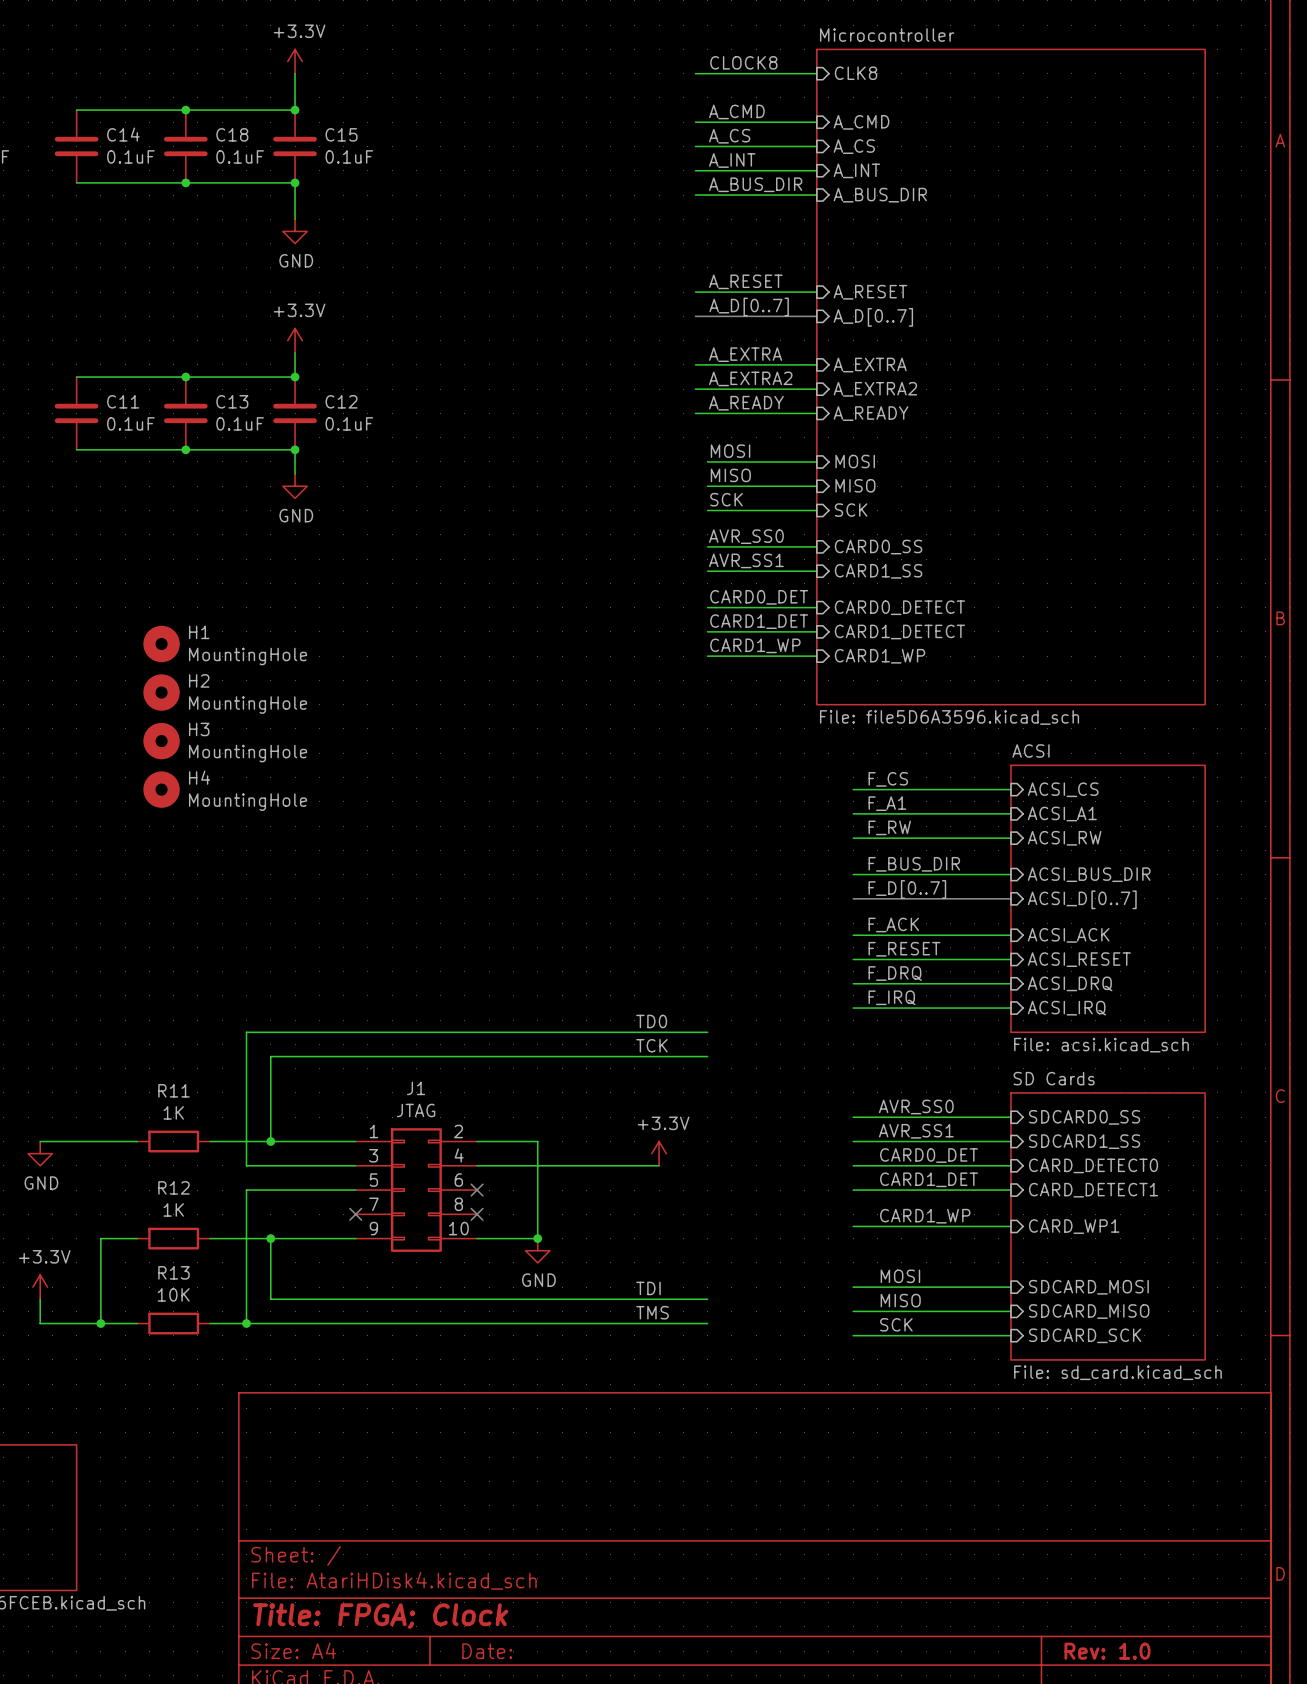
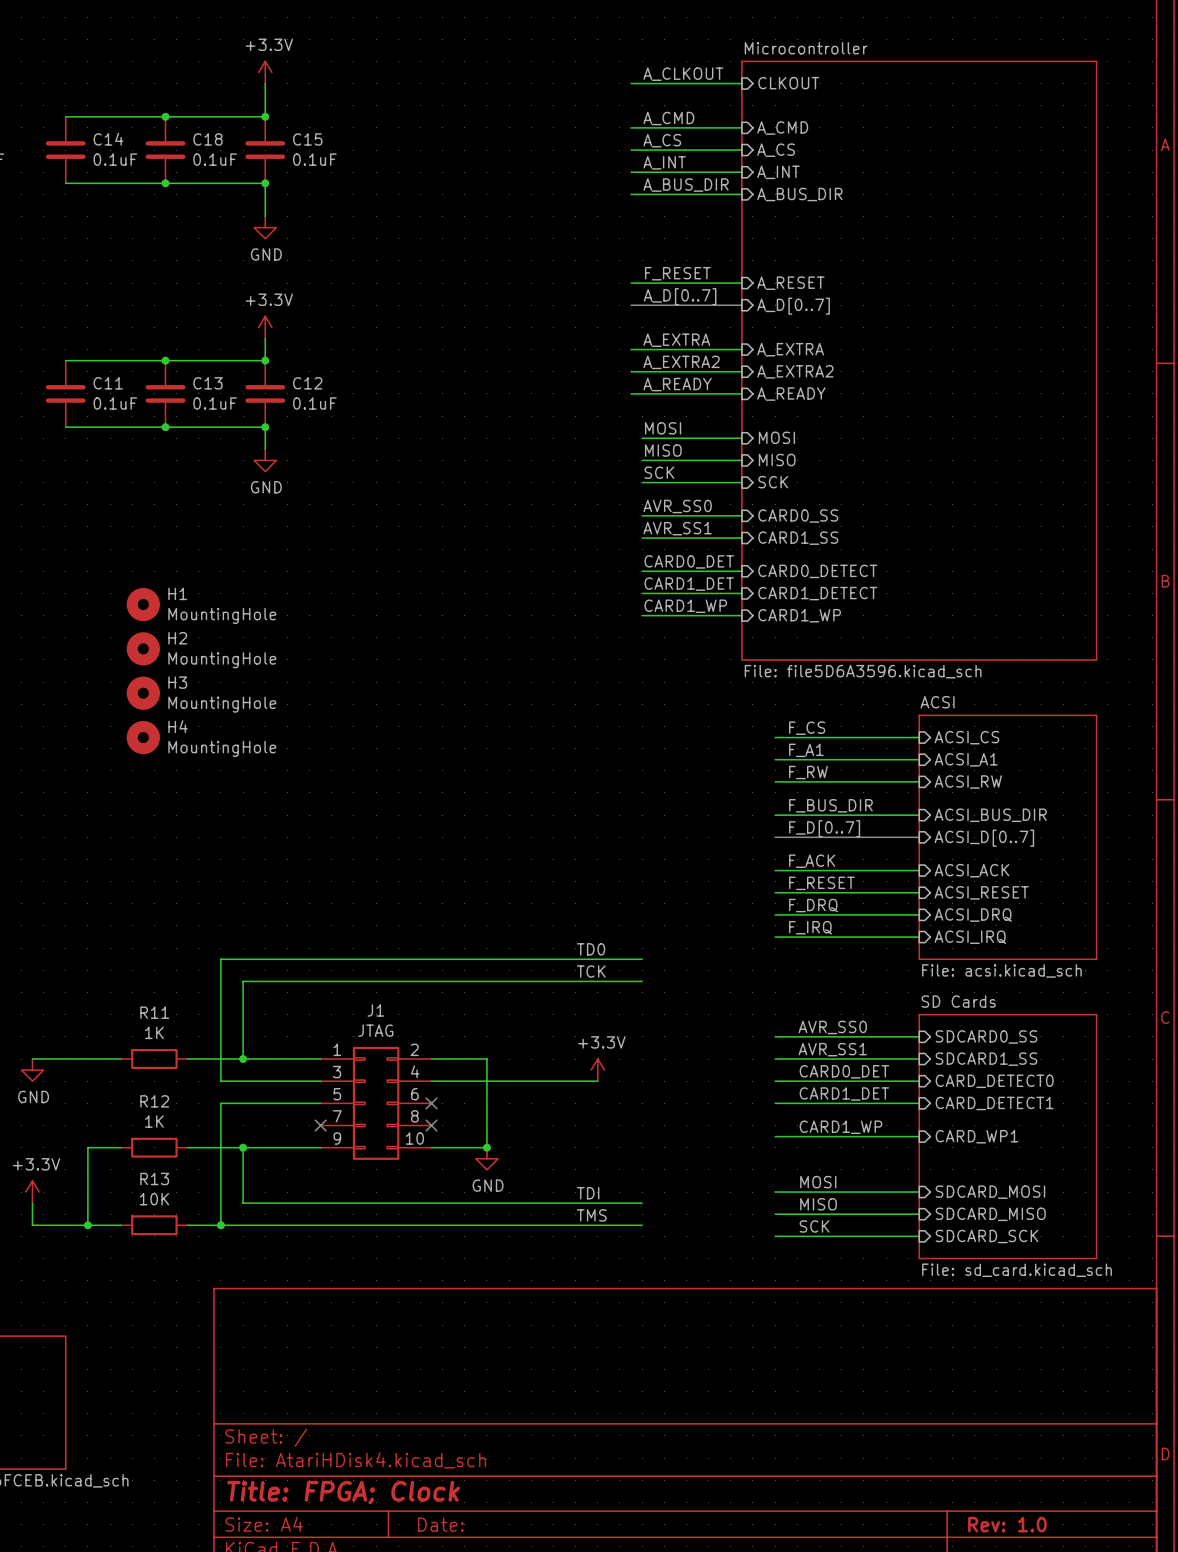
label: CLOCK8 (743, 62) -> A_CLKOUT (683, 74)
sheet pin: CLK8 (856, 73) -> CLKOUT (788, 83)
label: A_RESET (745, 281) -> F_RESET (677, 273)

